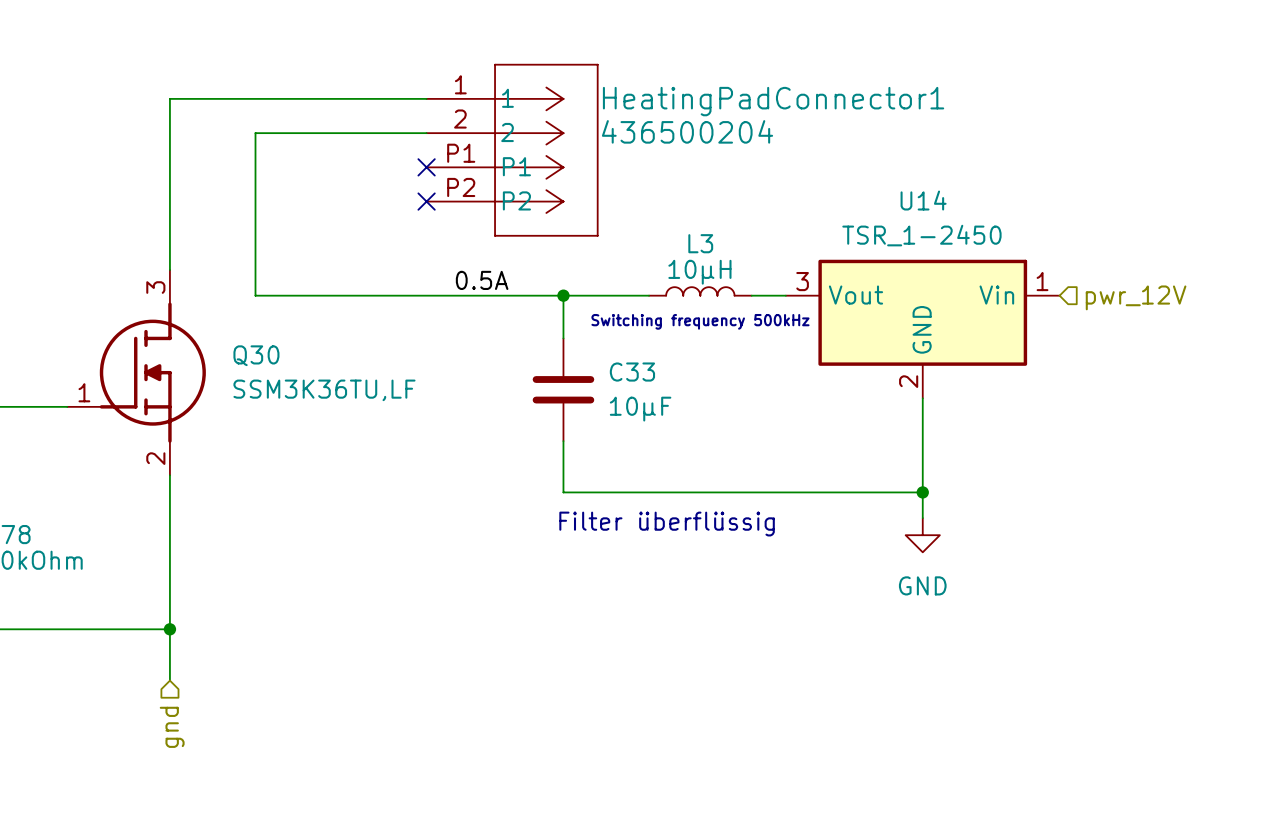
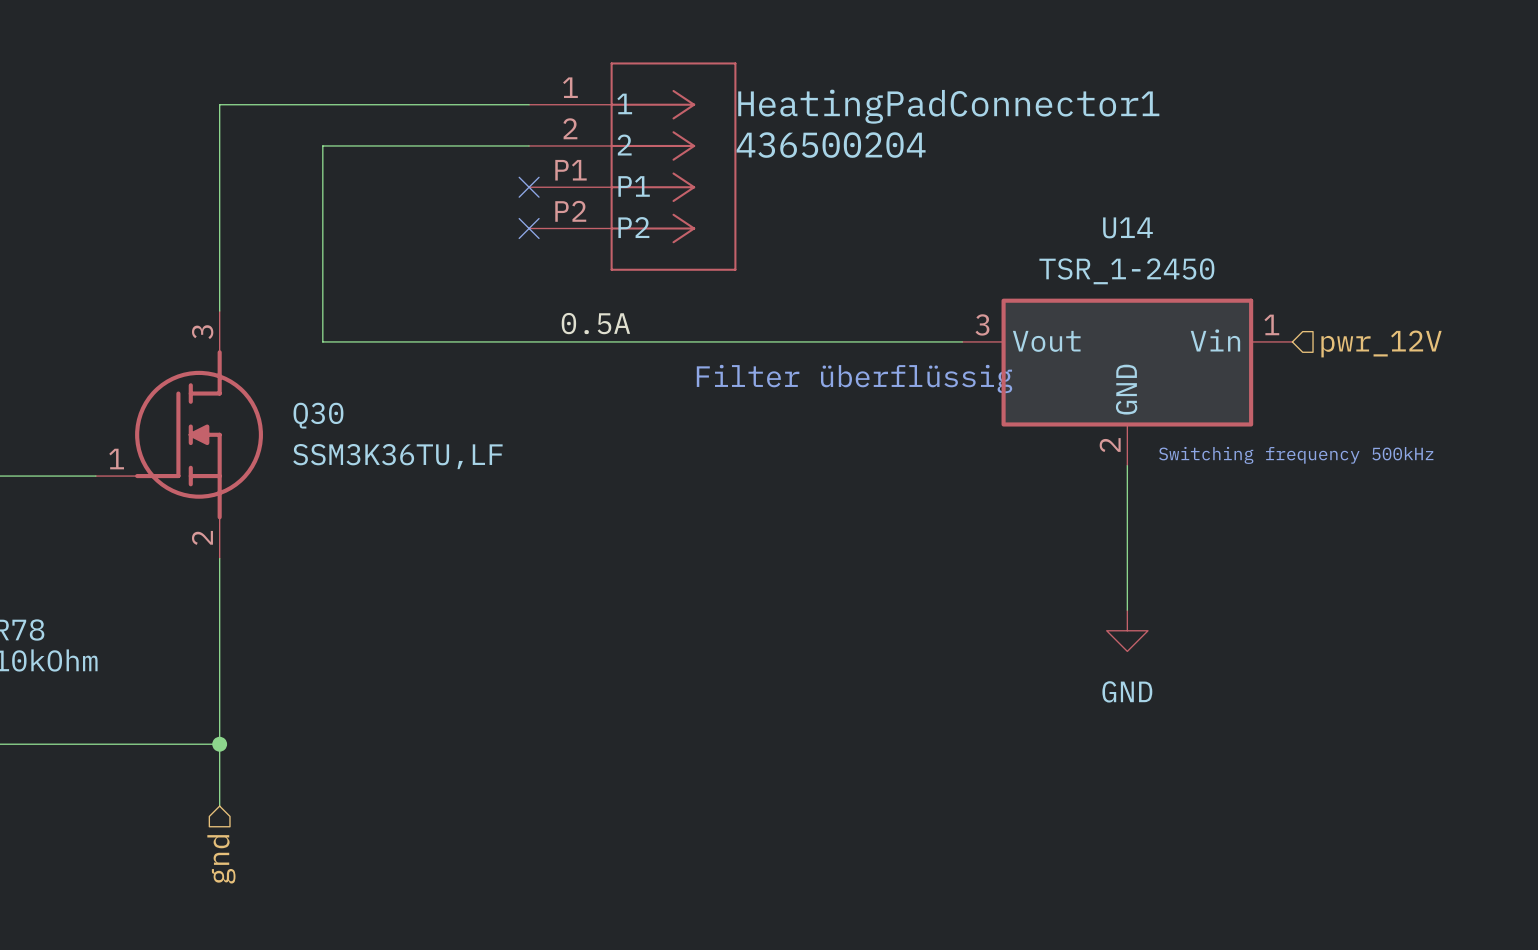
L3: 10µH (700, 291) -> none
wire: (563, 295) (563, 338) -> none
junction: (563, 295) -> none
wire: none -> (797, 341) (921, 341)
text: Switching frequency 500kHz (700, 321) -> none
C33: 10µF (563, 389) -> none
text: none -> Switching frequency 500kHz (1296, 455)
wire: (563, 441) (563, 492) (922, 492) -> none
junction: (922, 492) -> none
text position: Filter überflüssig (667, 524) -> Filter überflüssig (854, 379)

